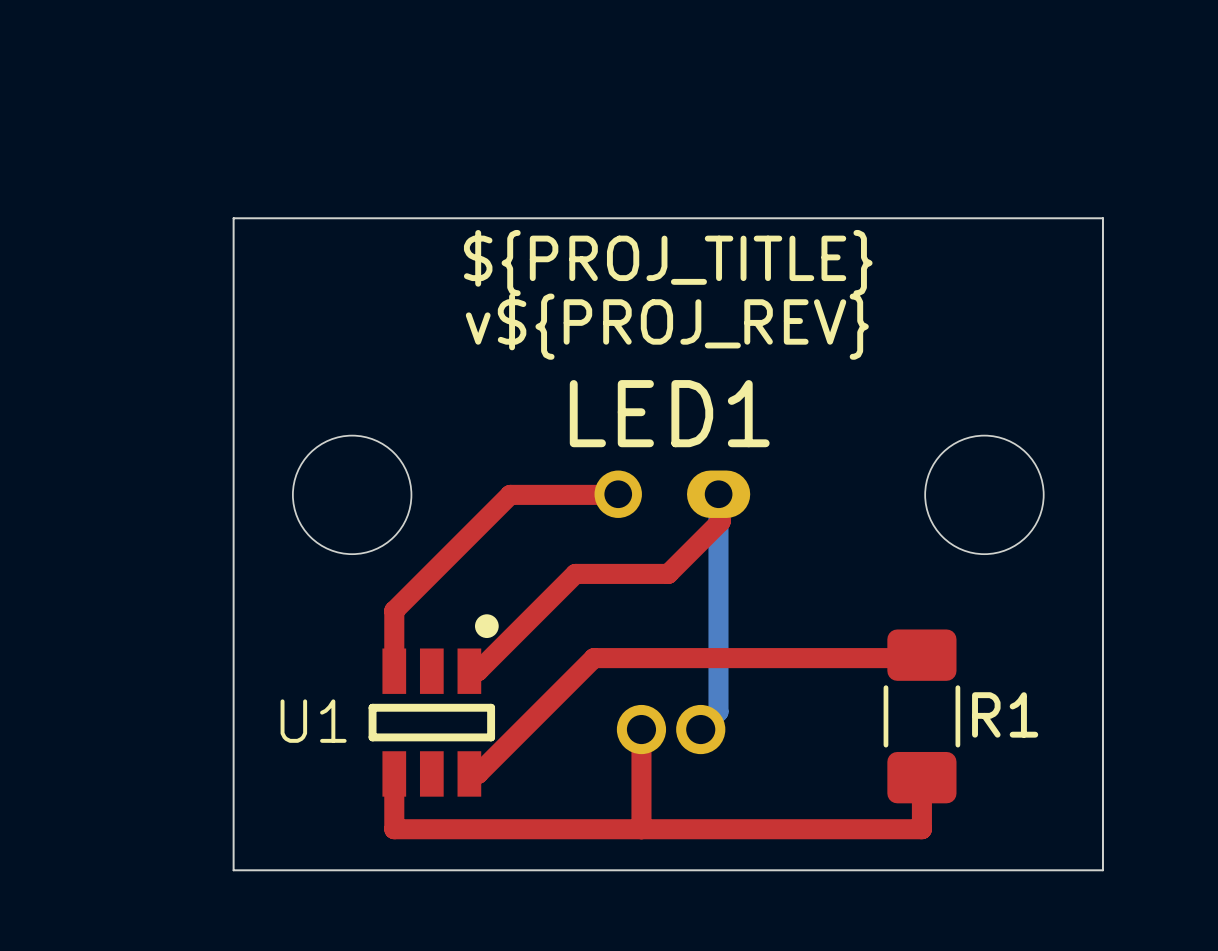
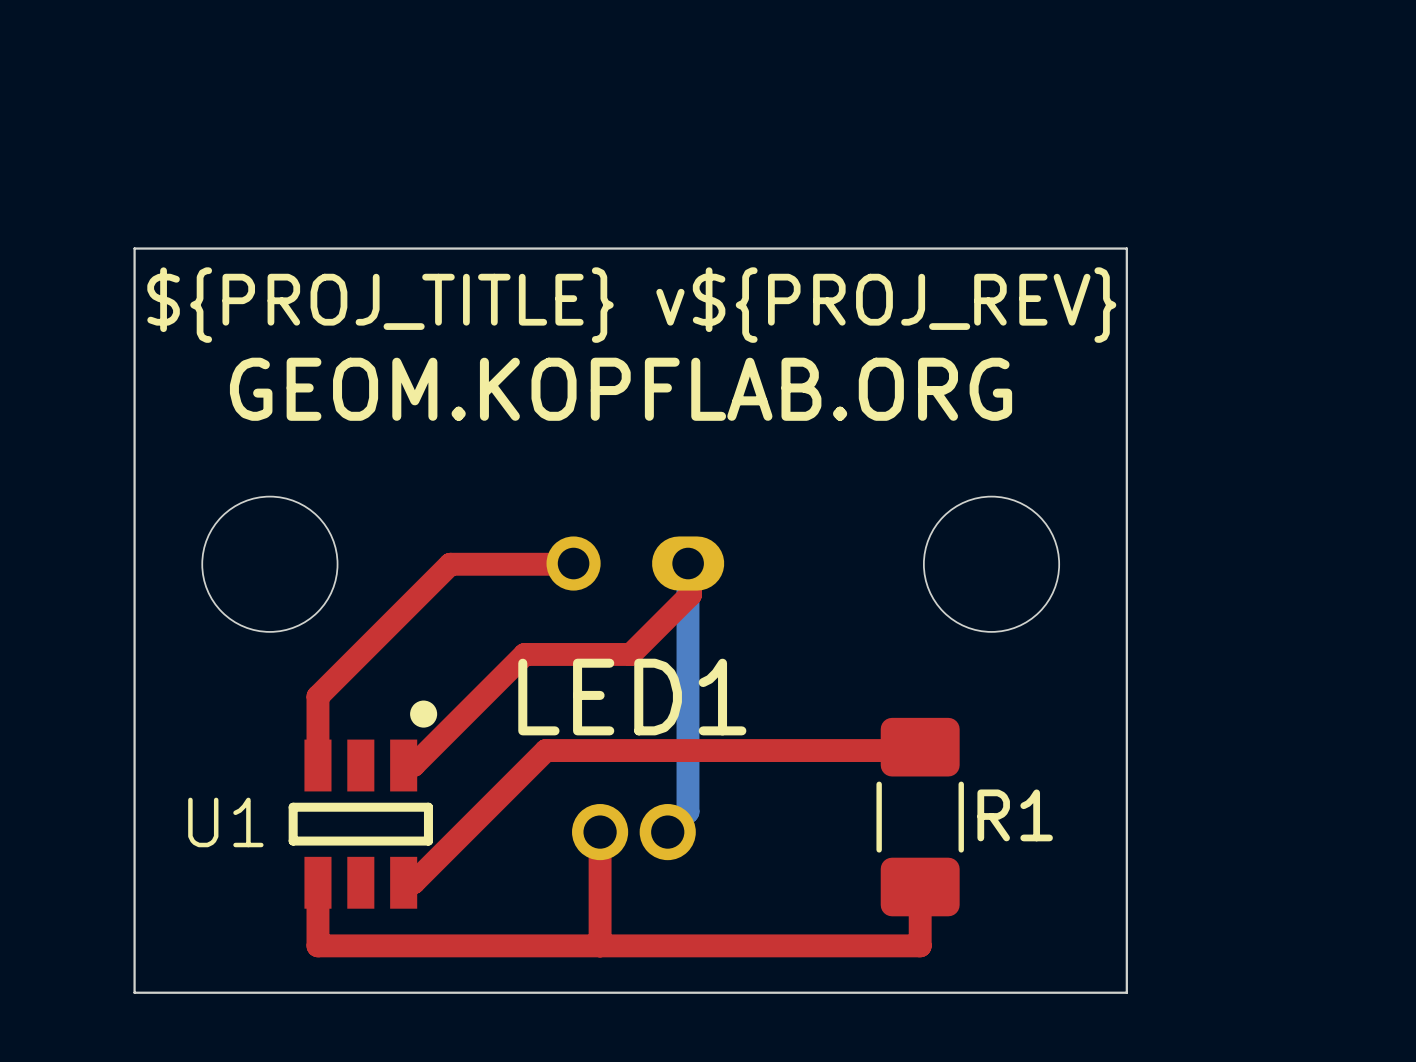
text: ${PROJ_TITLE} (668, 263) -> ${PROJ_TITLE} v${PROJ_REV} (631, 305)
text: v${PROJ_REV} (667, 326) -> GEOM.KOPFLAB.ORG (621, 389)
part text position: LED1 (669, 413) -> LED1 (632, 697)

